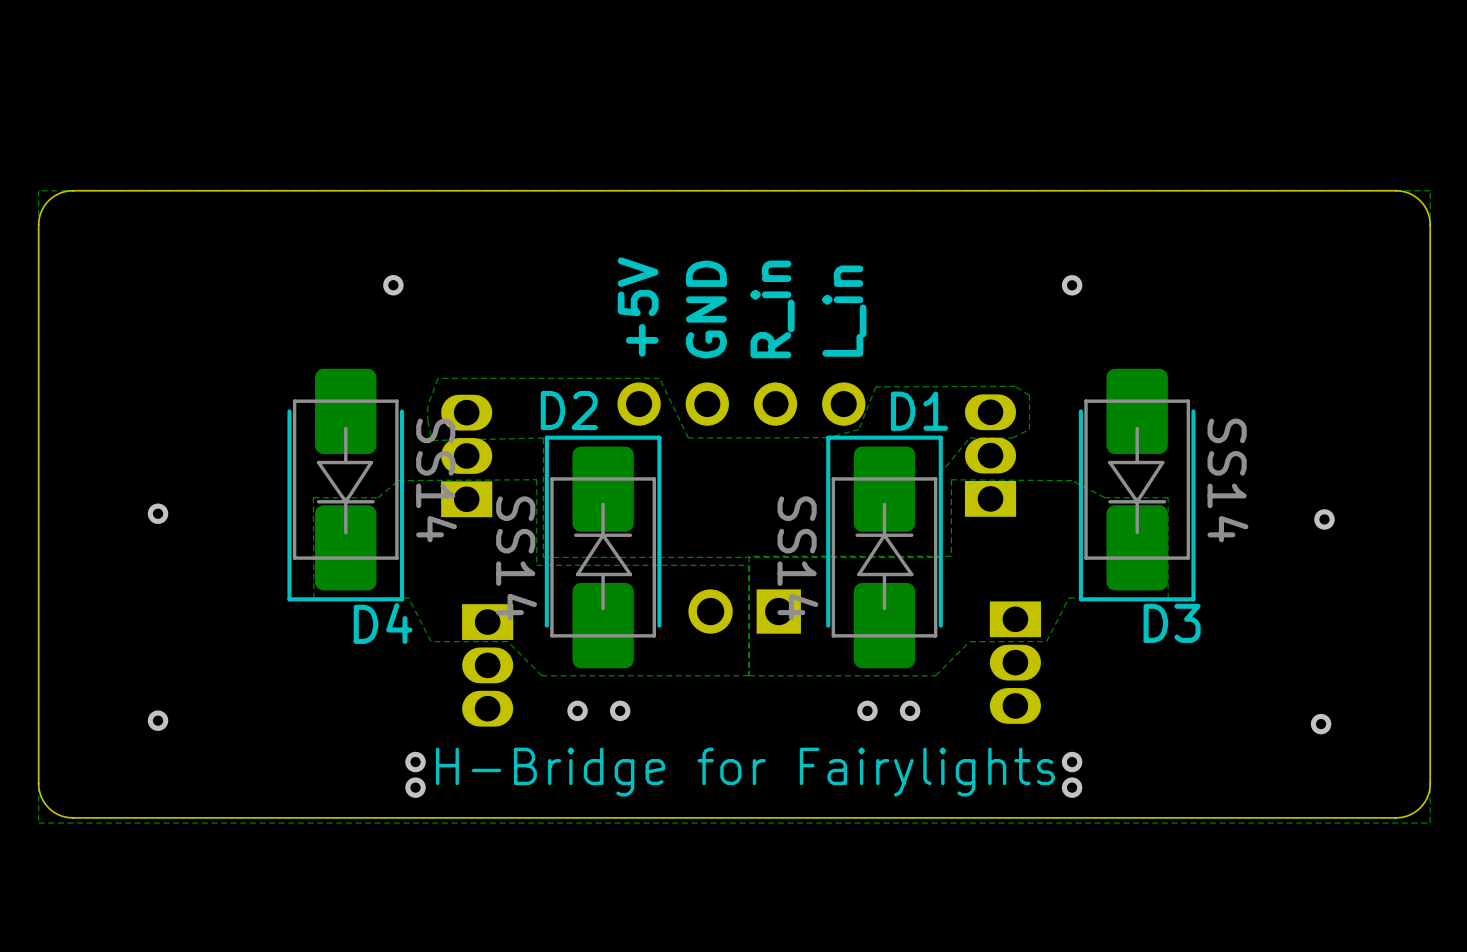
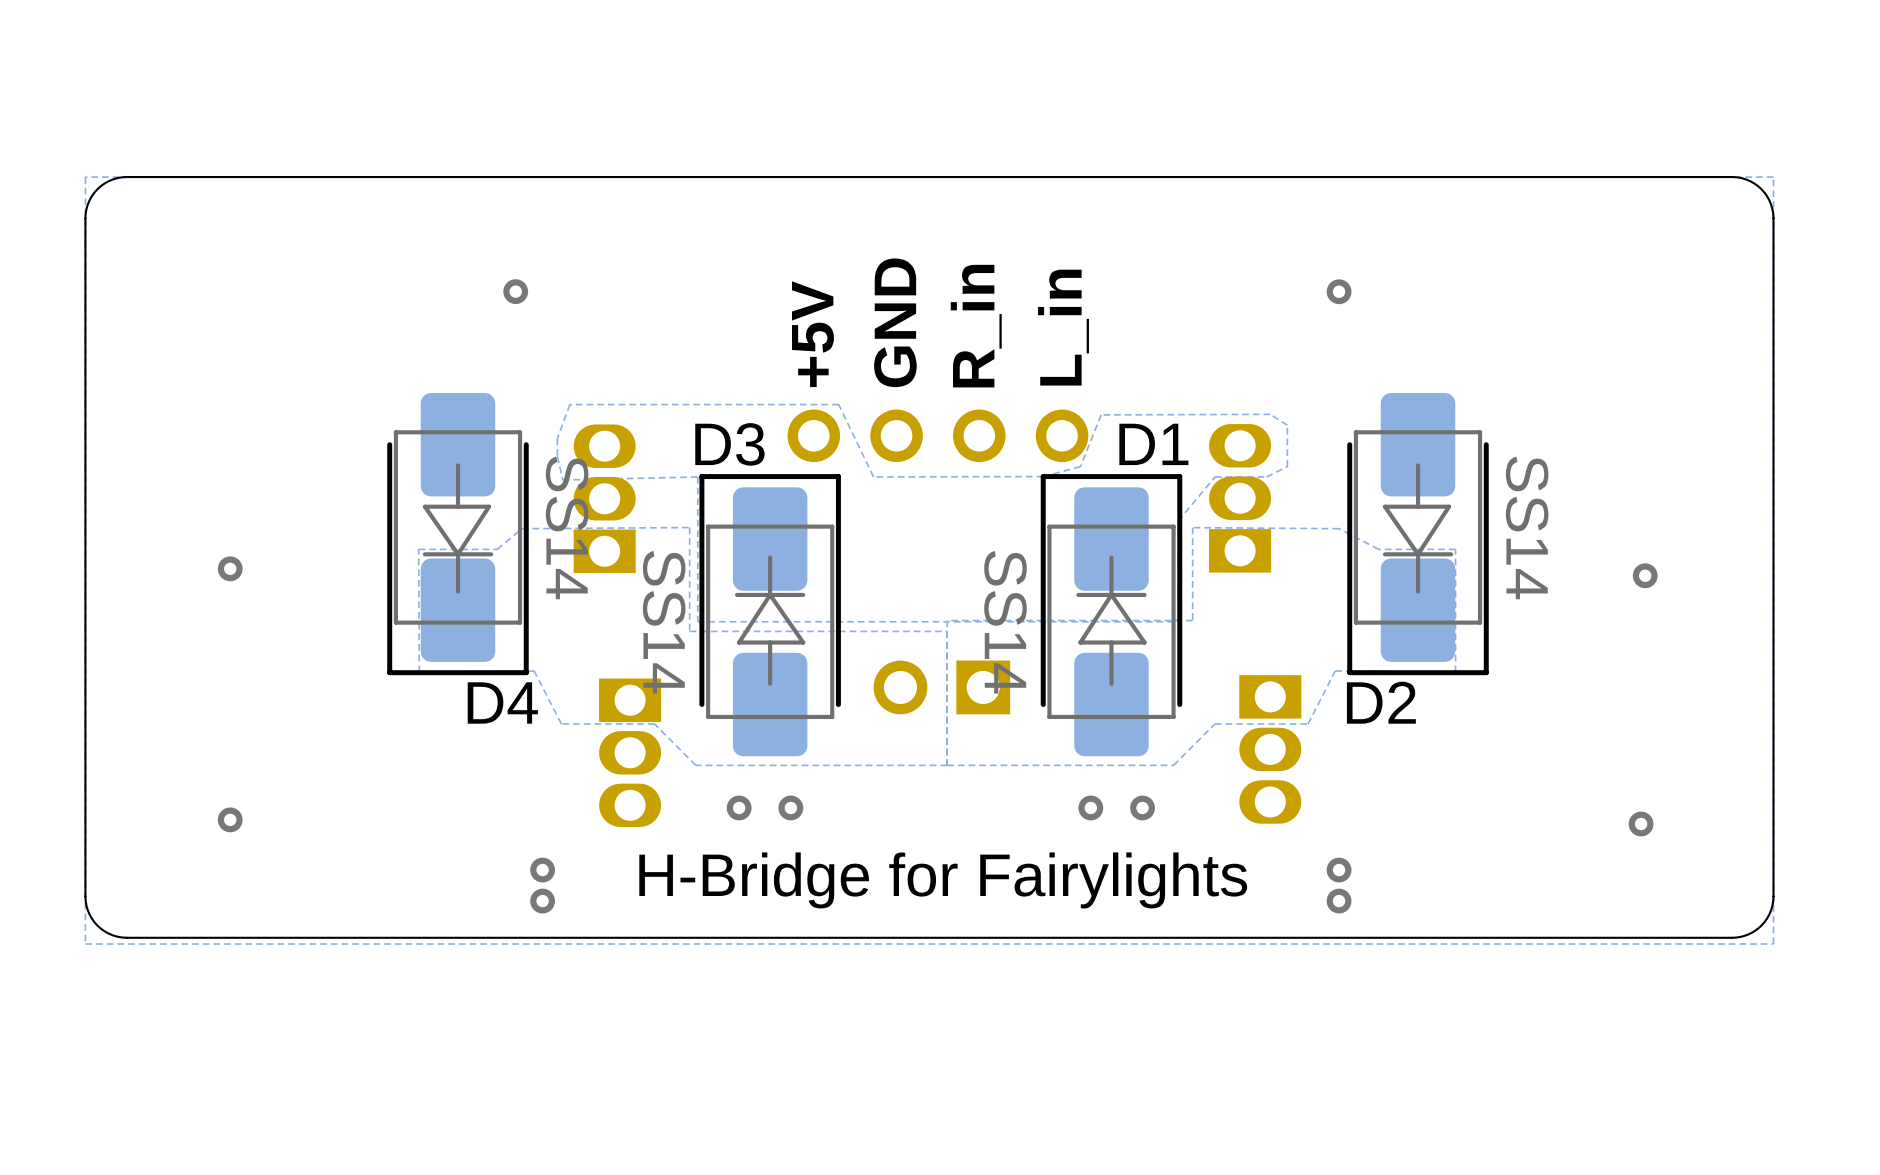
D2 name: D2 (569, 410) -> D3 (729, 444)
D3 name: D3 (1172, 623) -> D2 (1381, 702)

